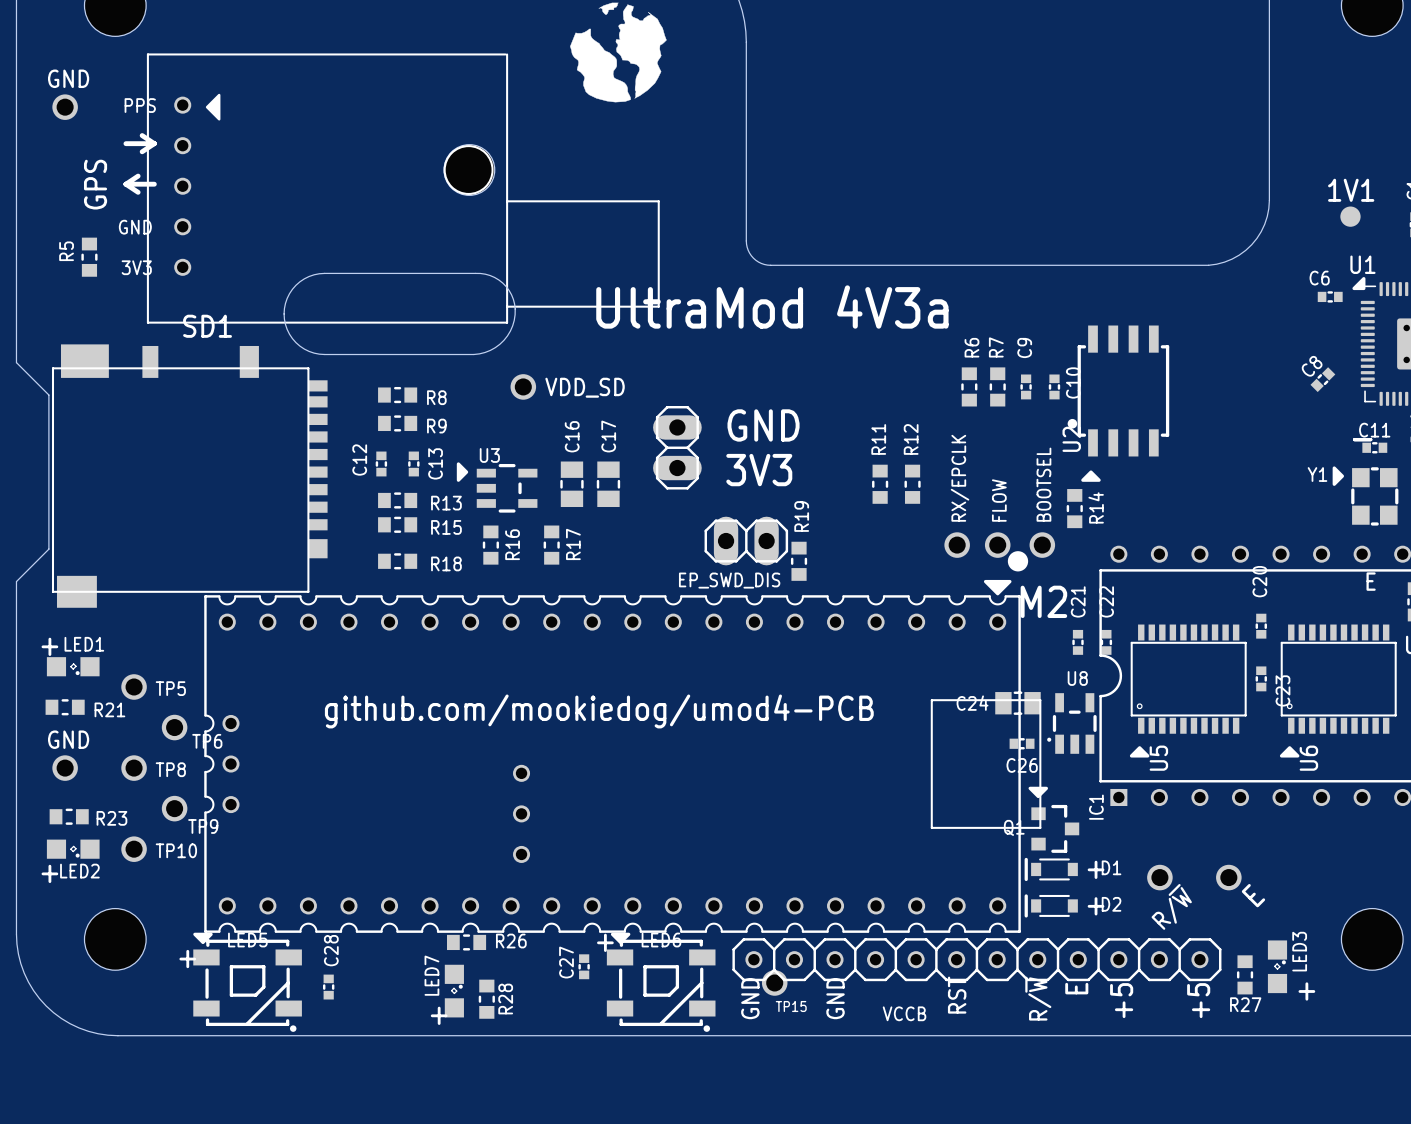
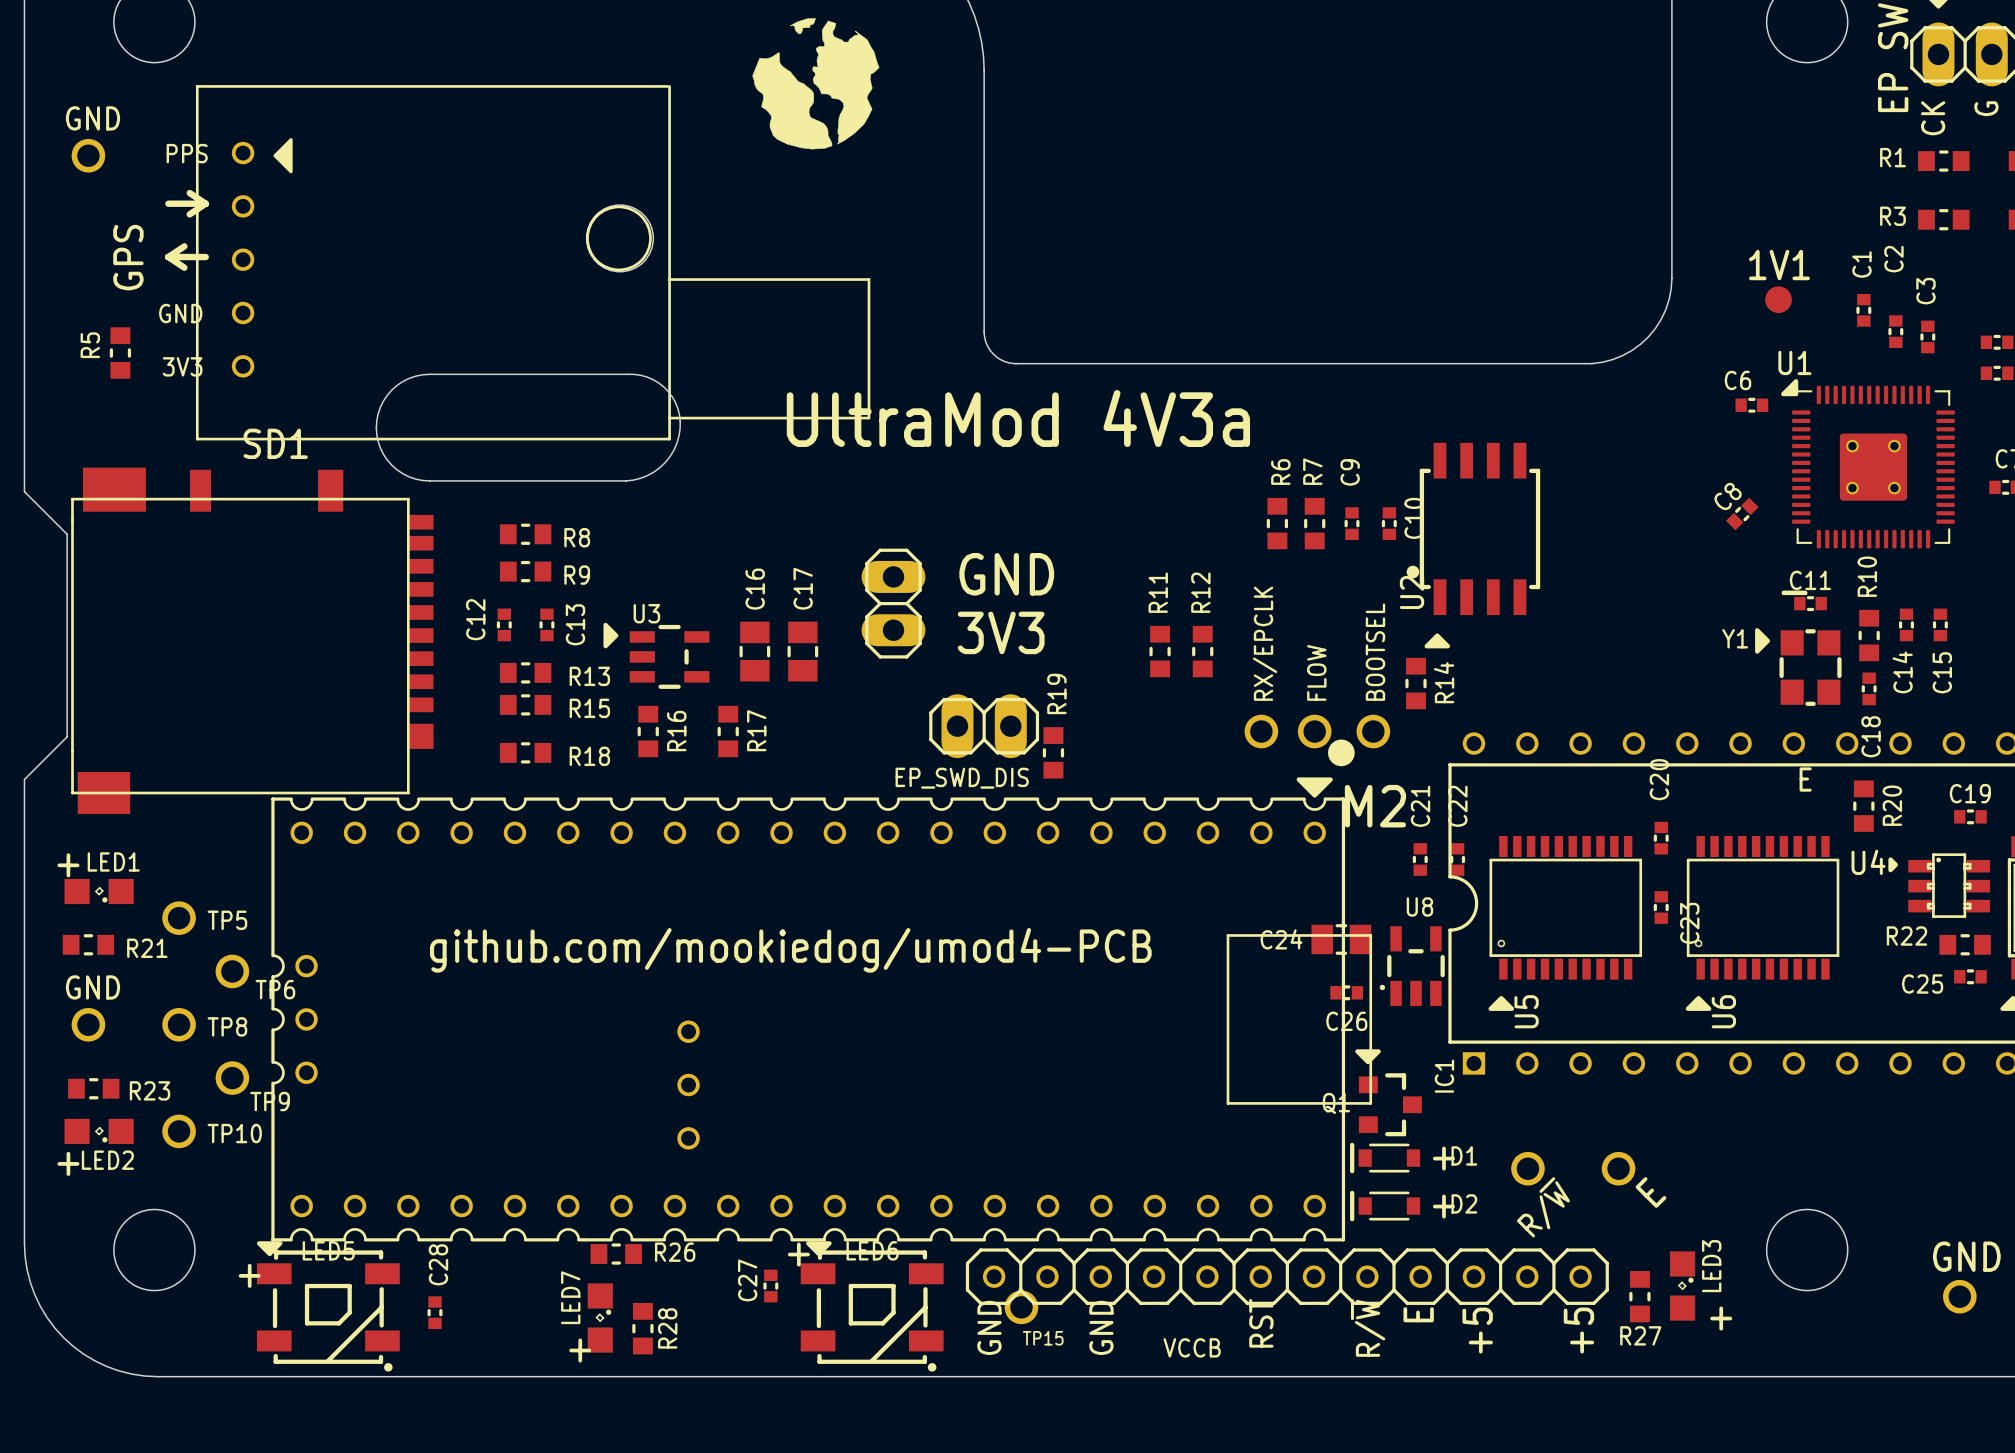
part: (523, 386) -> none
text: VDD_SD (585, 387) -> none

